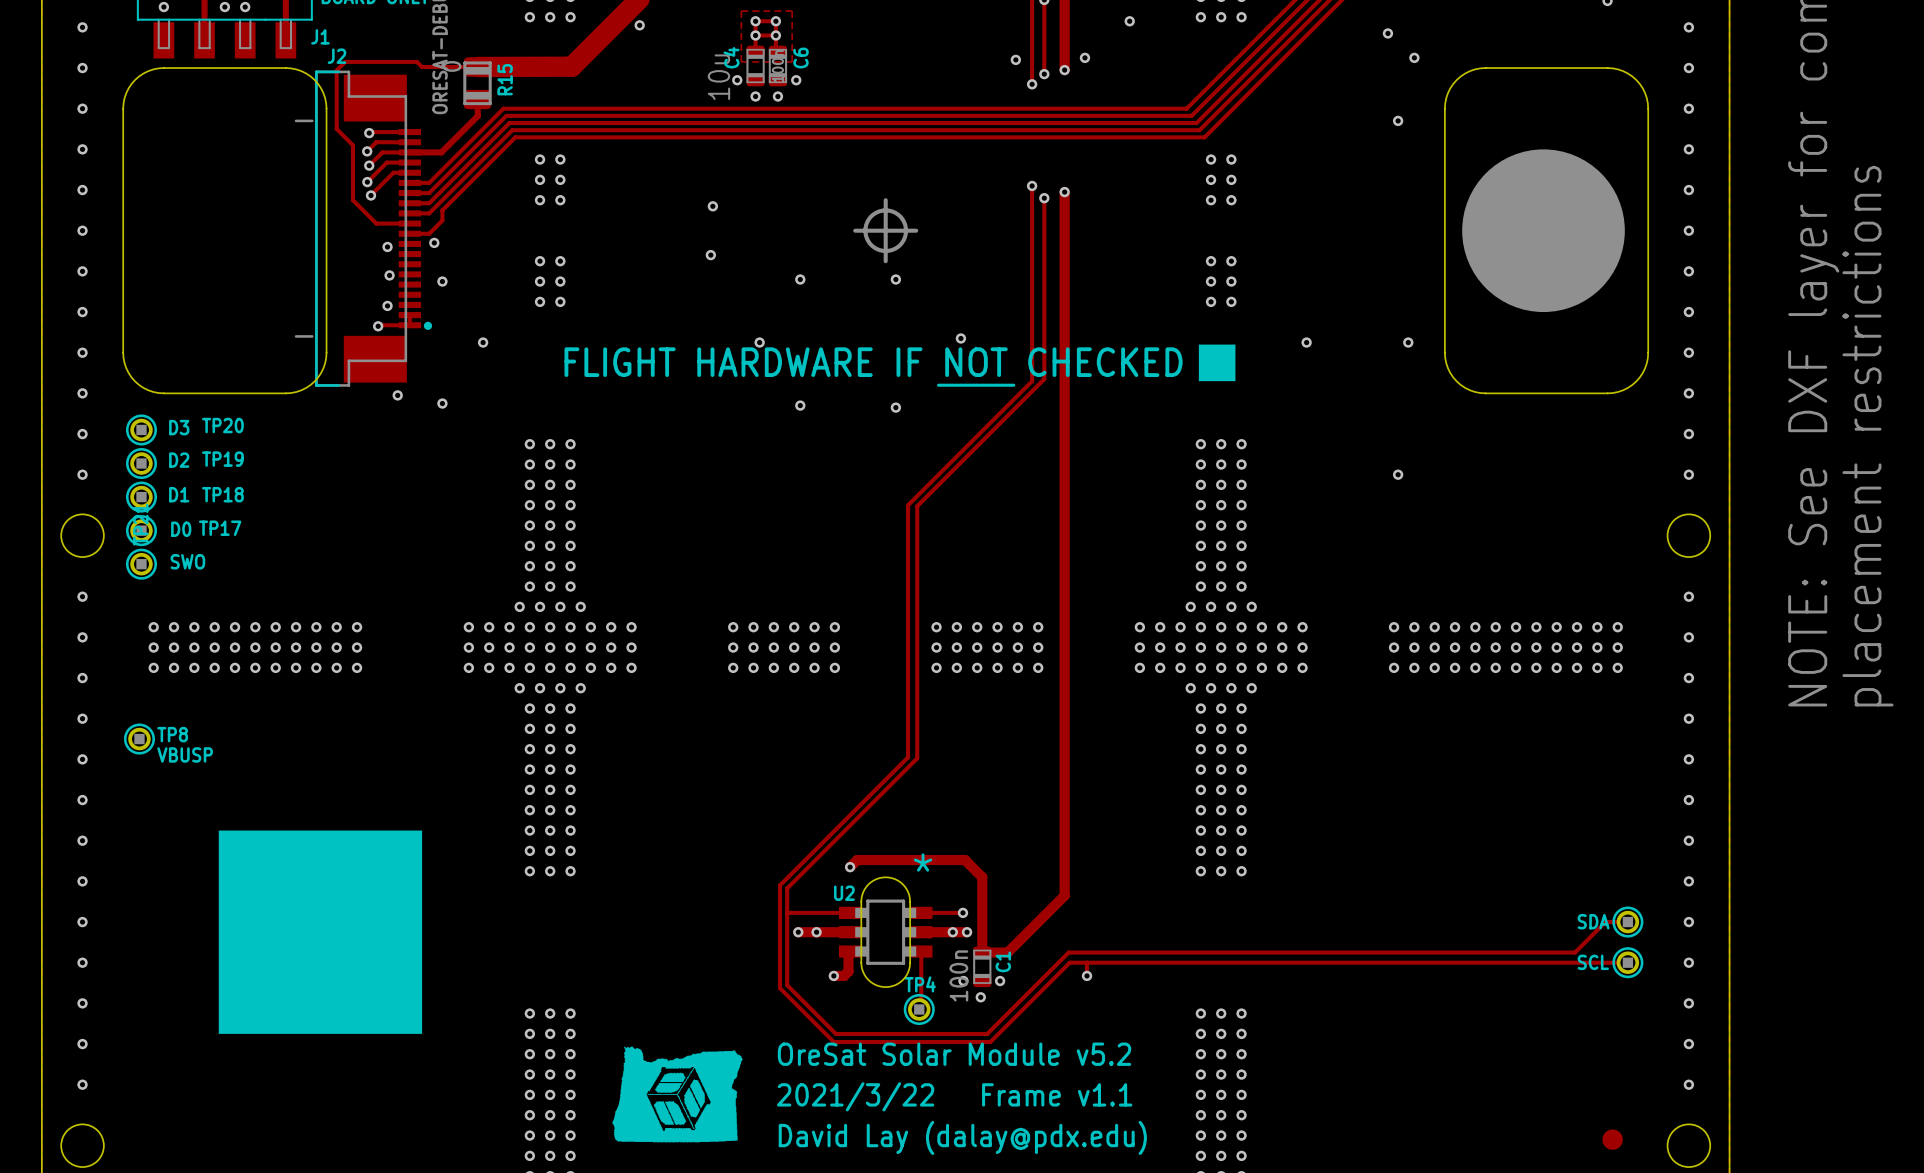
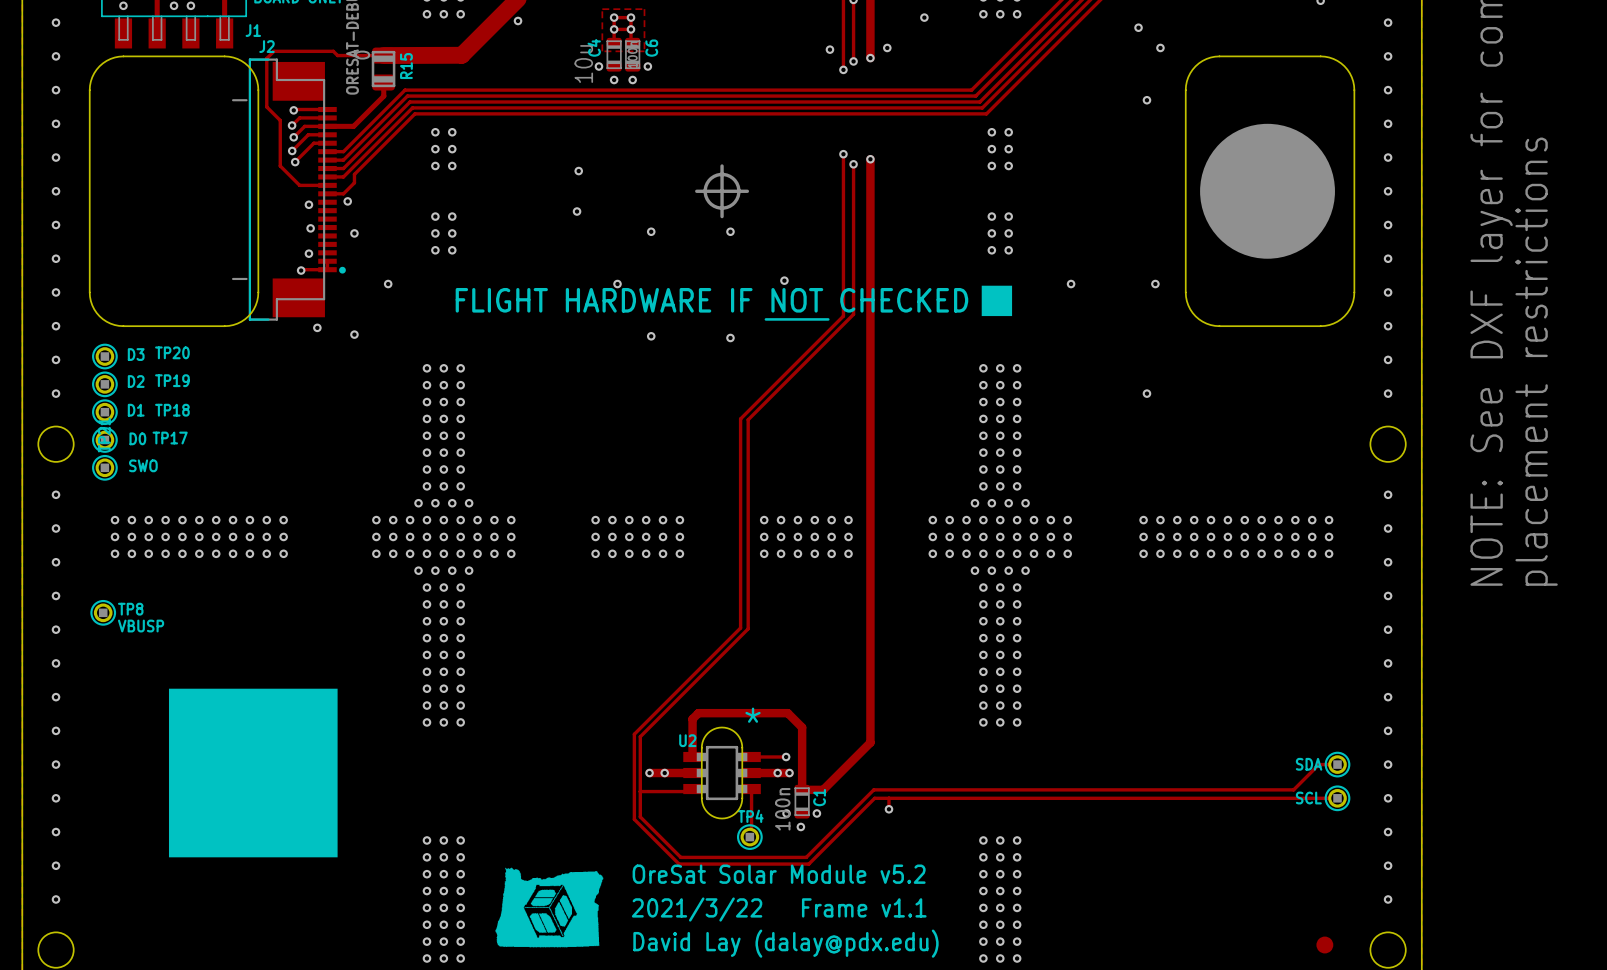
via: (850, 867) -> none
track: (787, 912) (850, 912) -> (692, 719) (692, 757)
track: (848, 951) (848, 971) (844, 975) (833, 975) -> none
track: none -> (692, 789) (690, 791) (640, 791)
via: (833, 975) -> none

